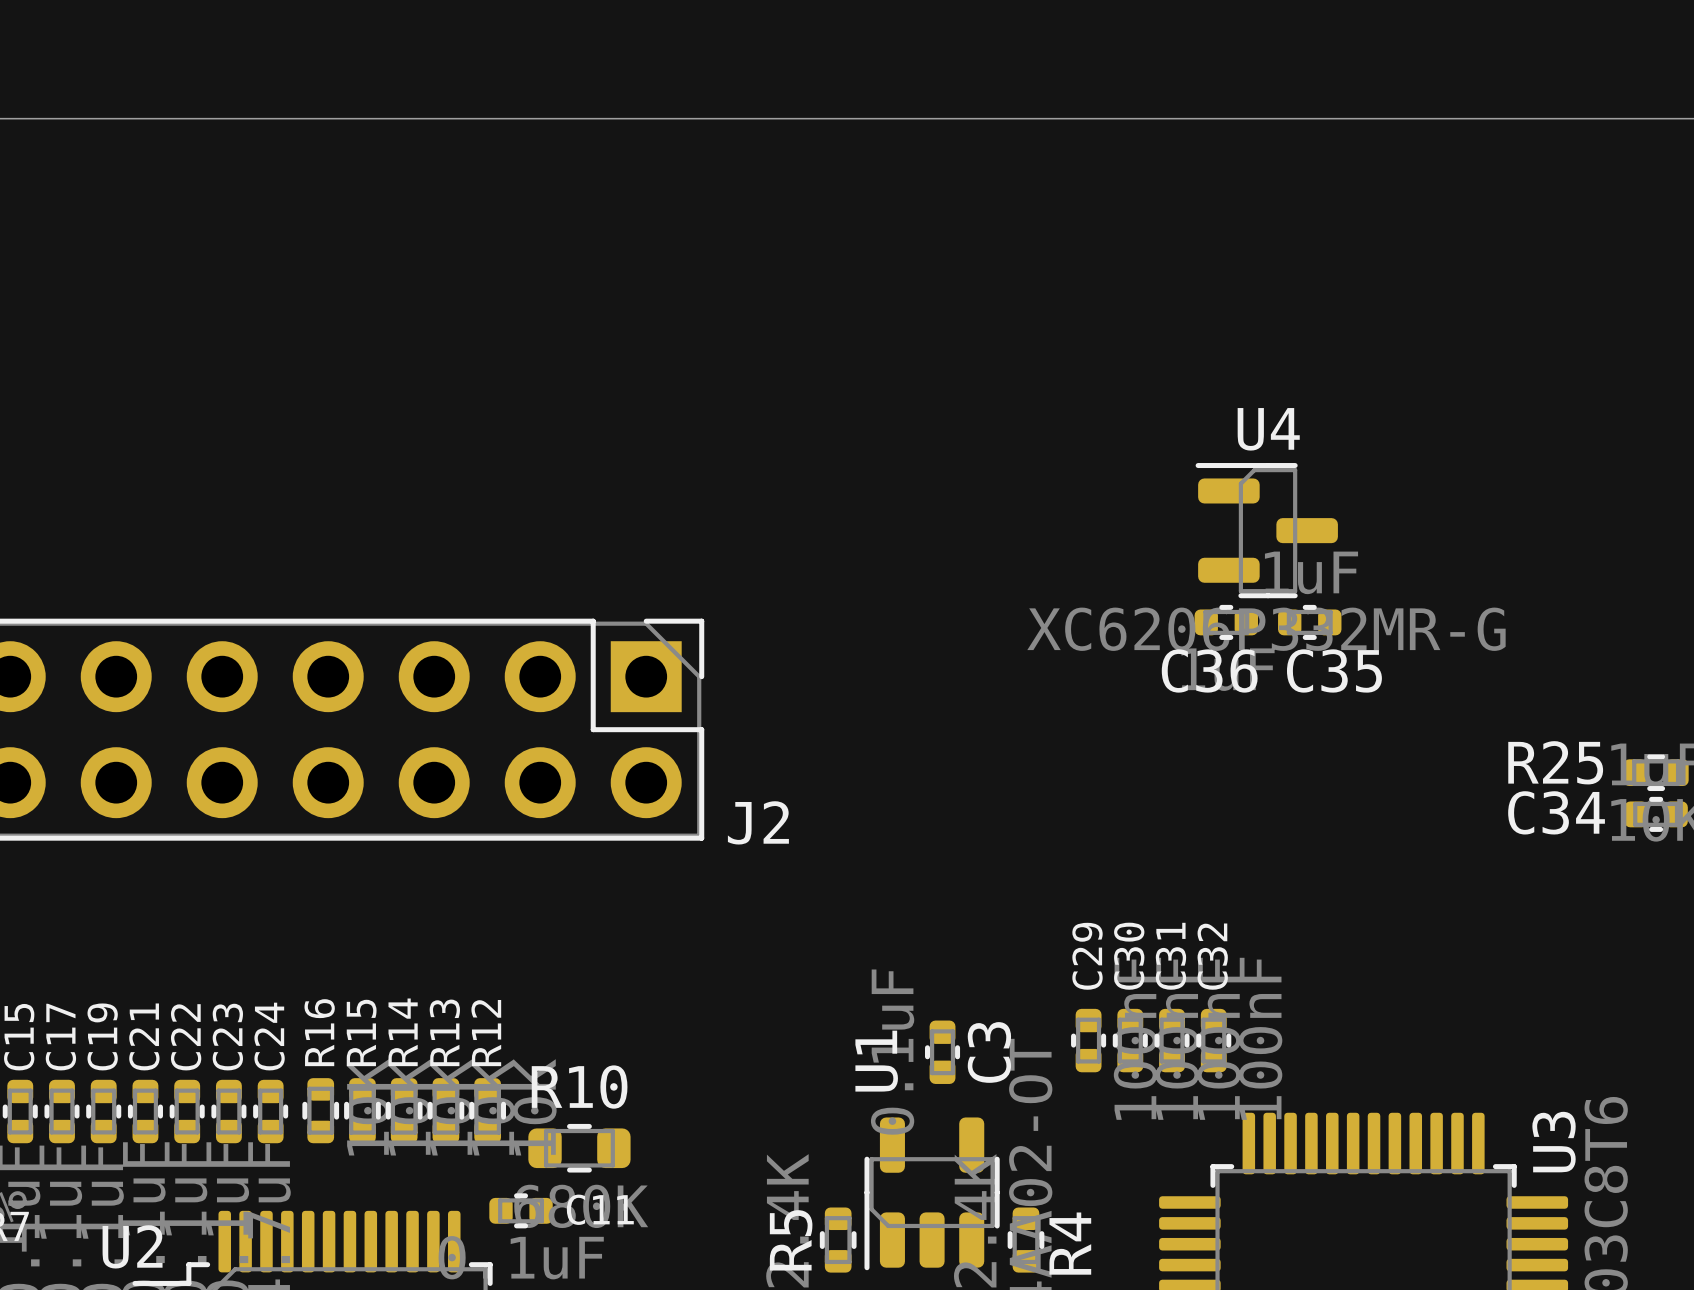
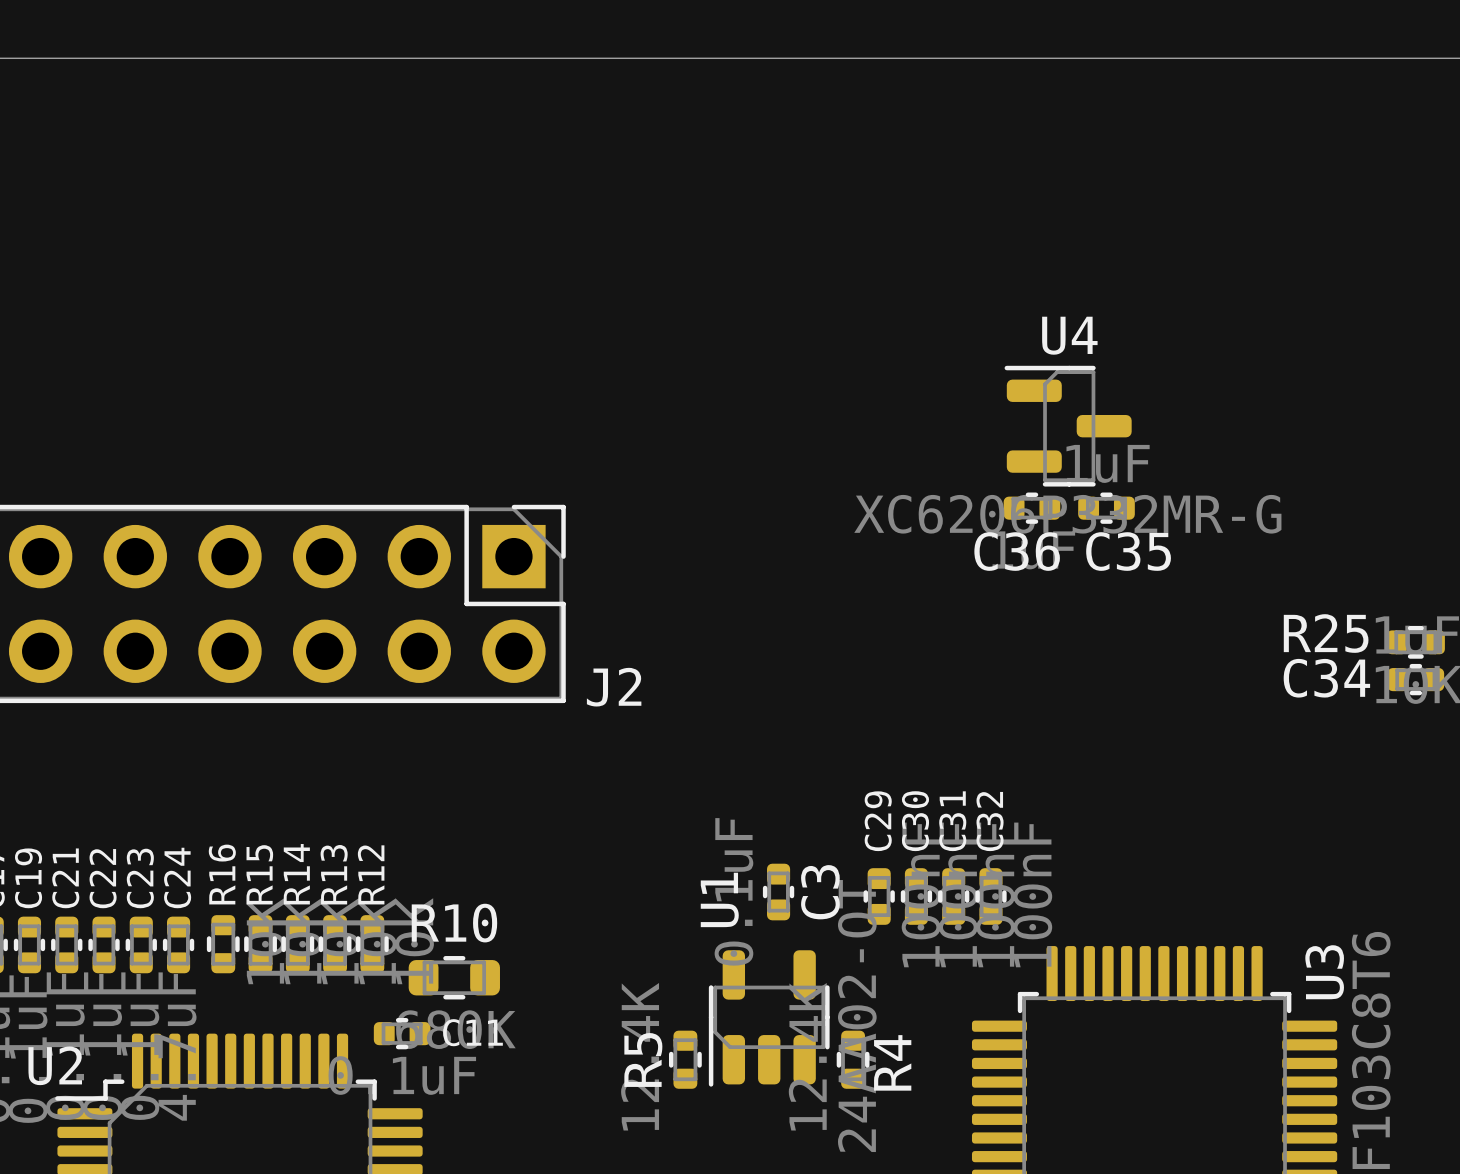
C29 position: (1088, 1040) -> (879, 896)
C30 position: (1130, 1040) -> (916, 896)
C31 position: (1172, 1040) -> (953, 896)
C32 position: (1213, 1040) -> (990, 896)

